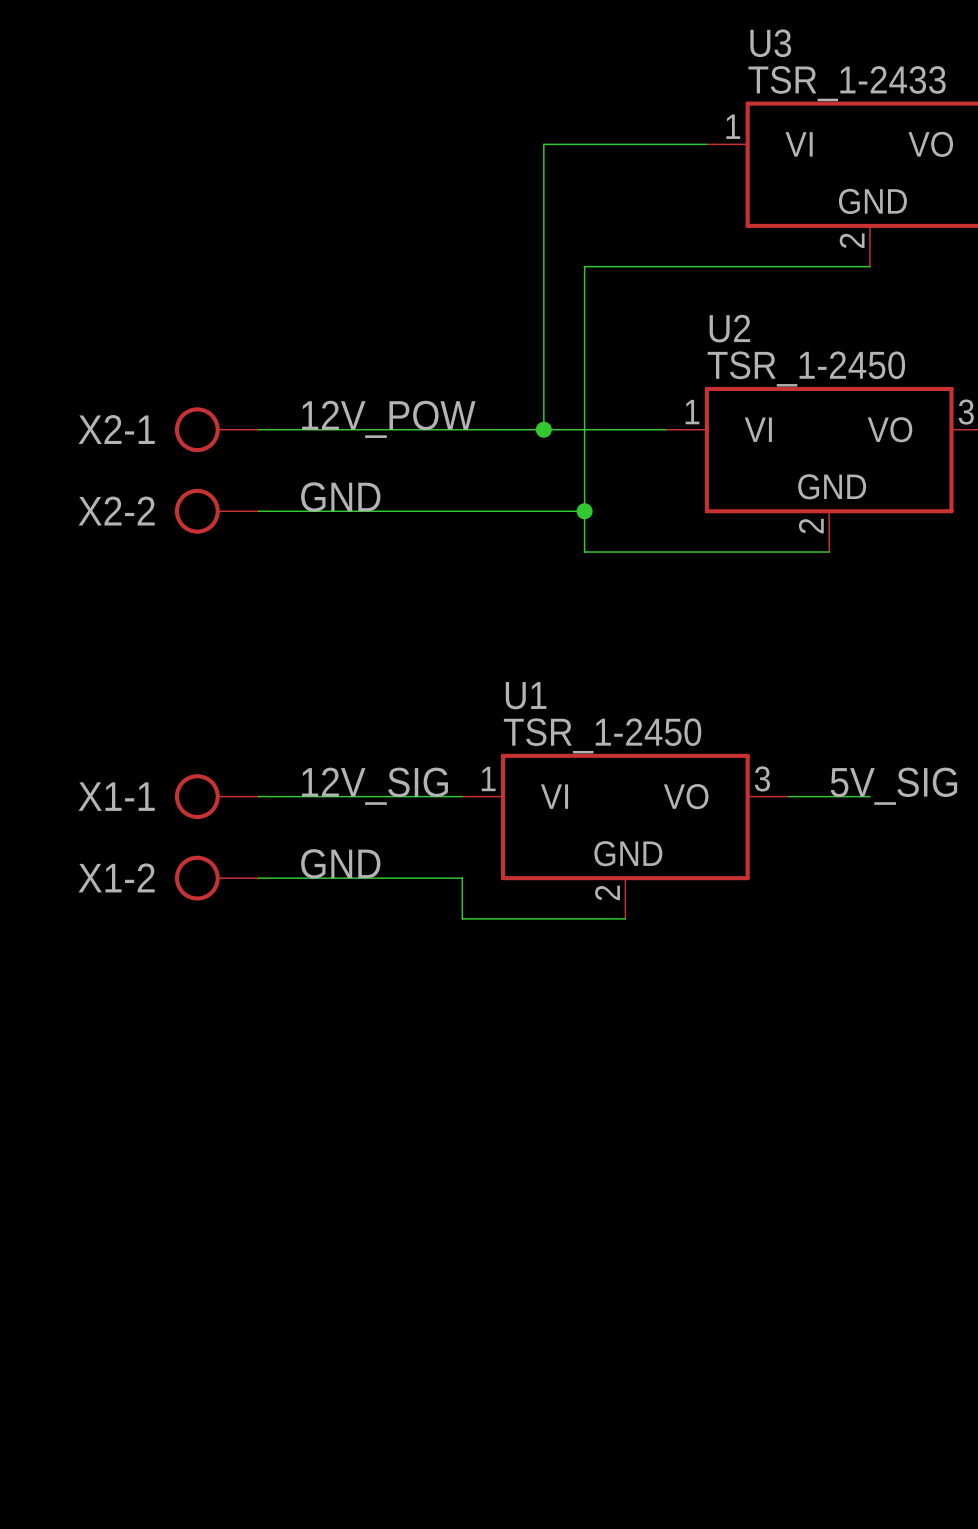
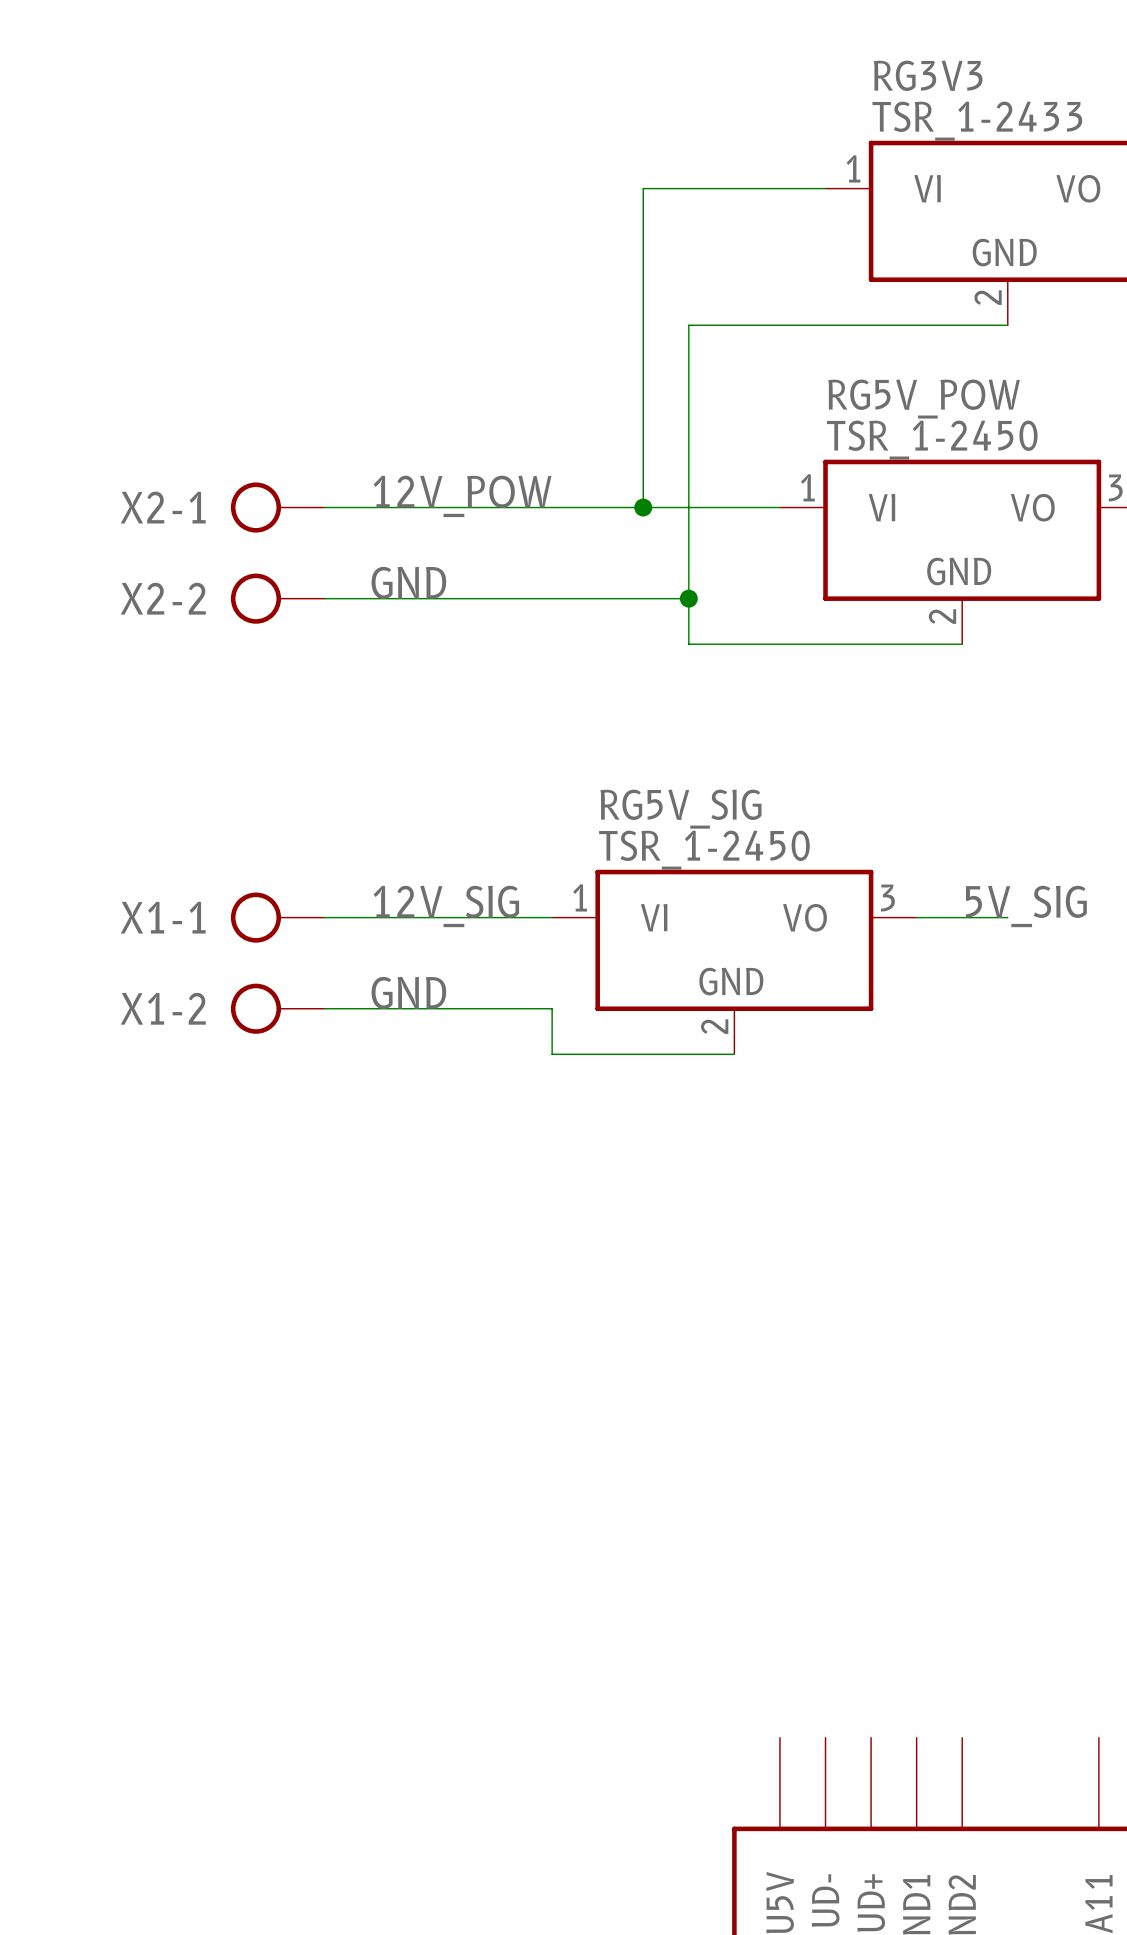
U3 name: U3 (770, 43) -> RG3V3 (928, 75)
U2 name: U2 (729, 328) -> RG5V_POW (924, 399)
U1 name: U1 (526, 695) -> RG5V_SIG (680, 809)

